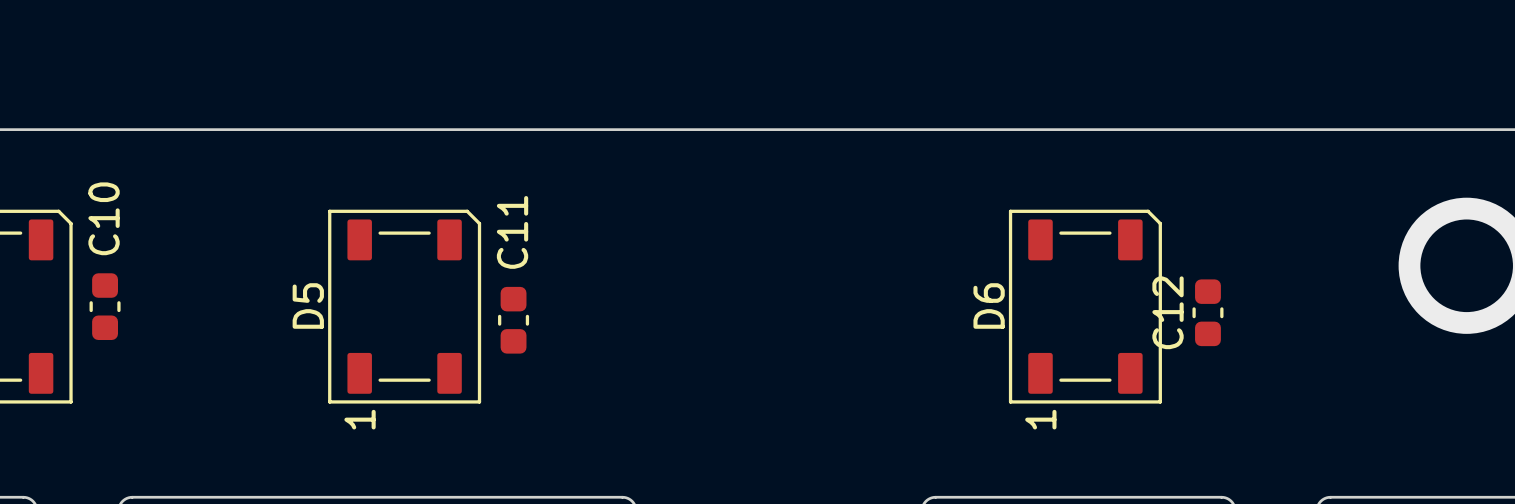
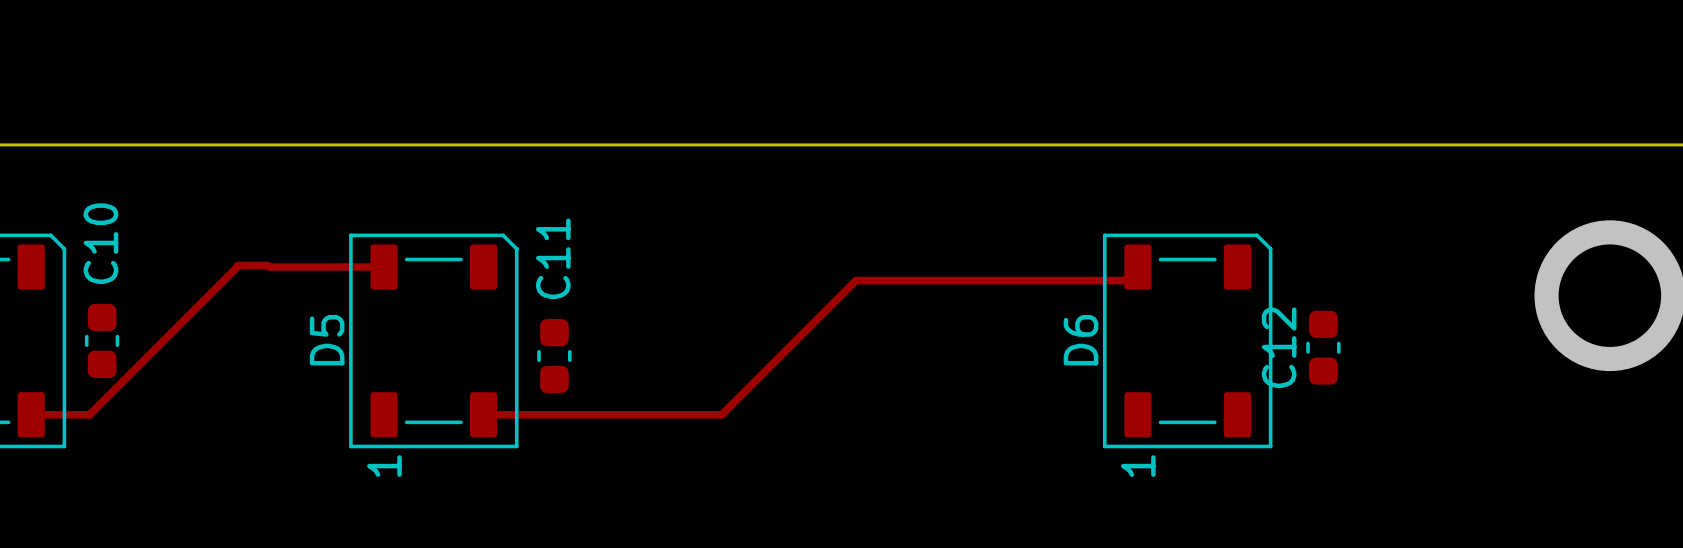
track: none -> (384, 267) (237, 265) (89, 414) (31, 414)
track: none -> (1137, 267) (1124, 280) (855, 280) (721, 414) (483, 414)

